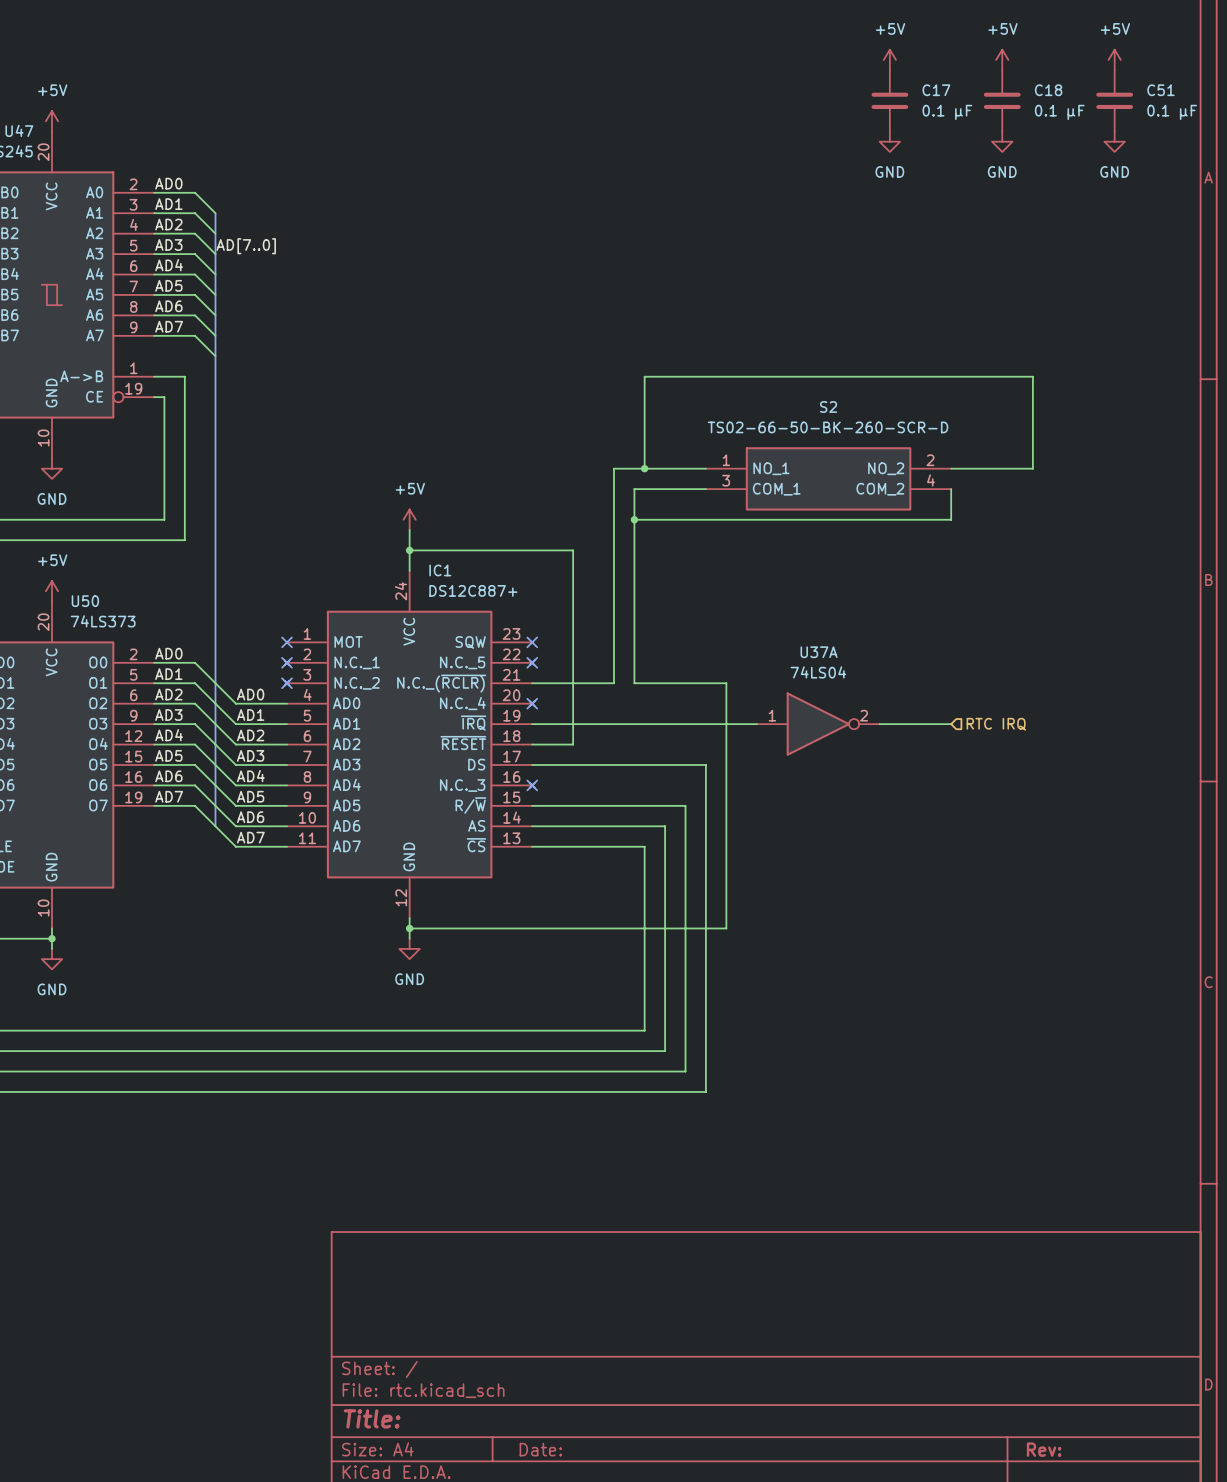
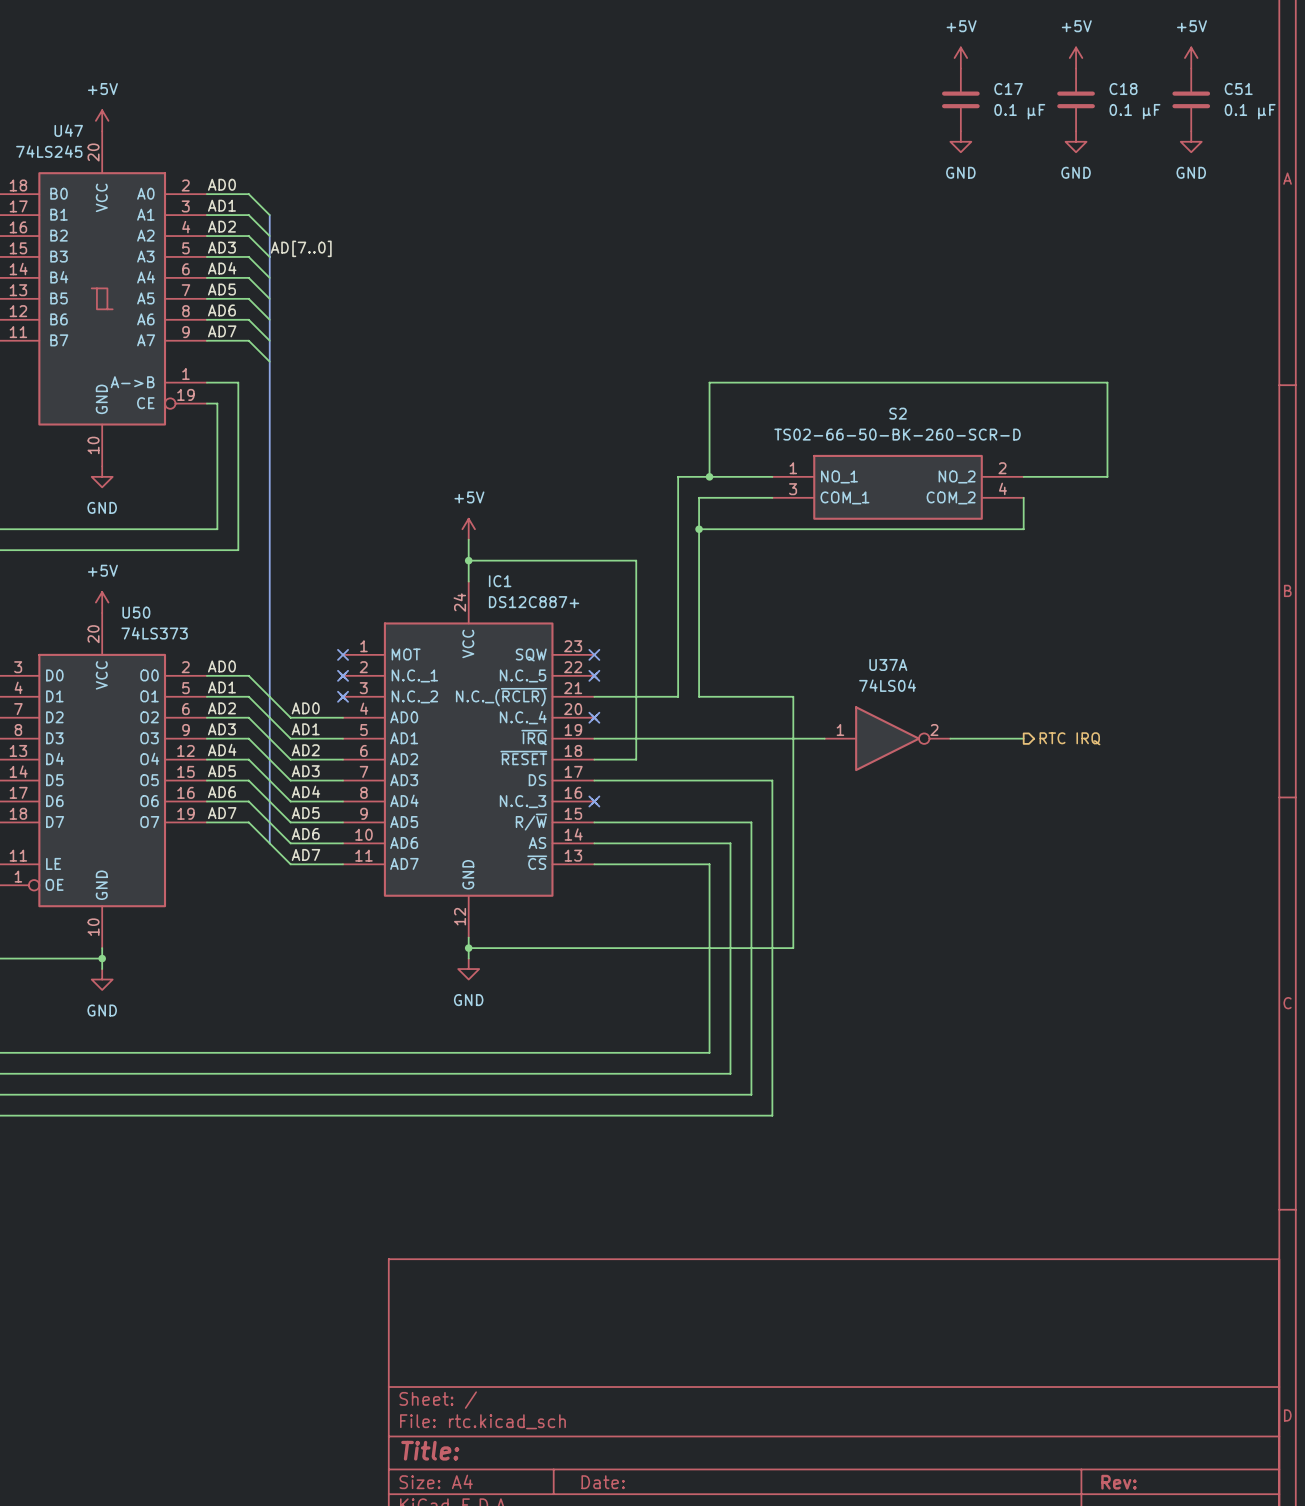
hierarchical label shape: input (996, 724) -> output (1069, 738)

